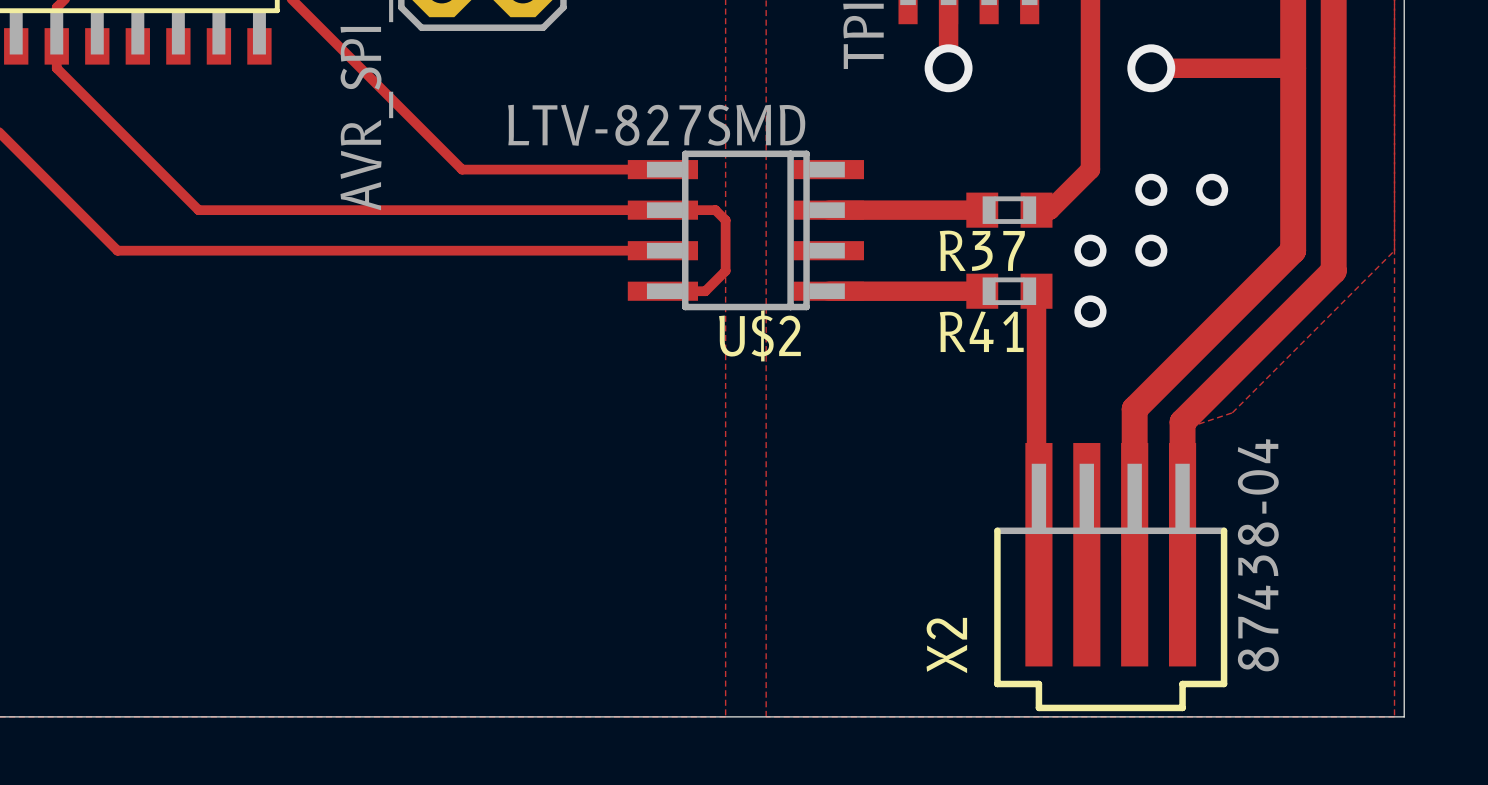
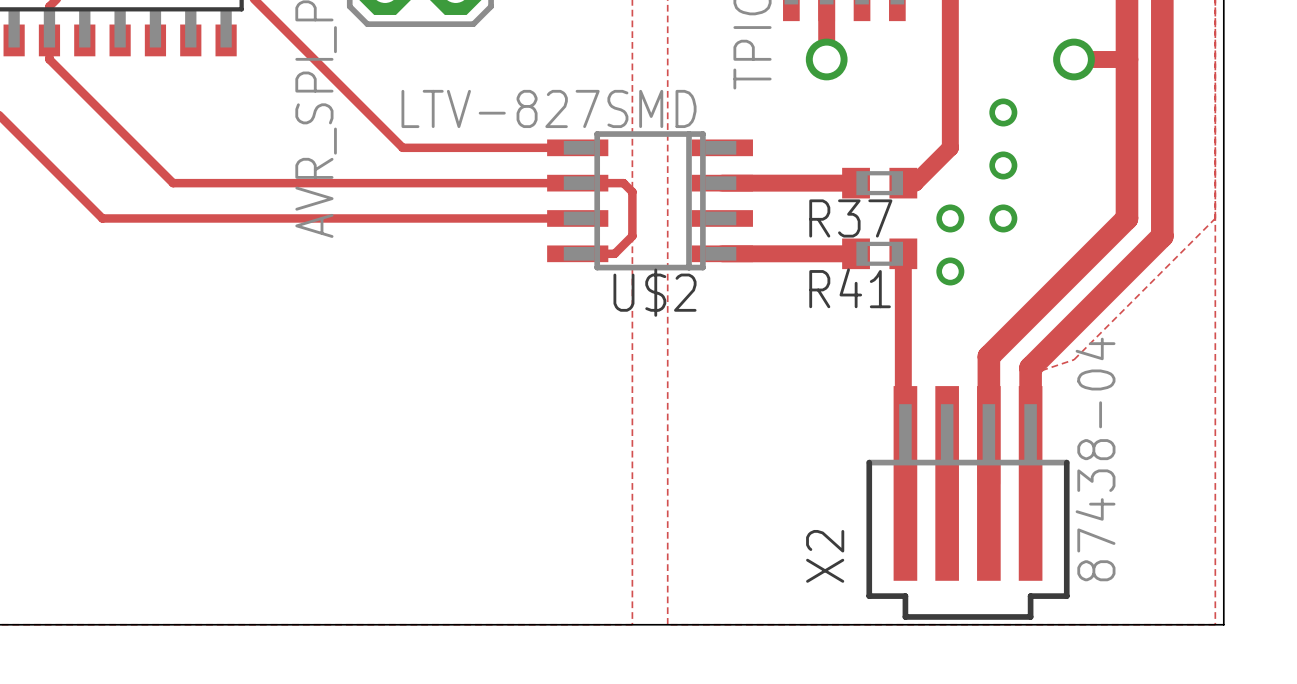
track: (1151, 68) (1232, 68) -> none
via position: (1151, 68) -> (1074, 59)
via position: (1212, 189) -> (1003, 112)

